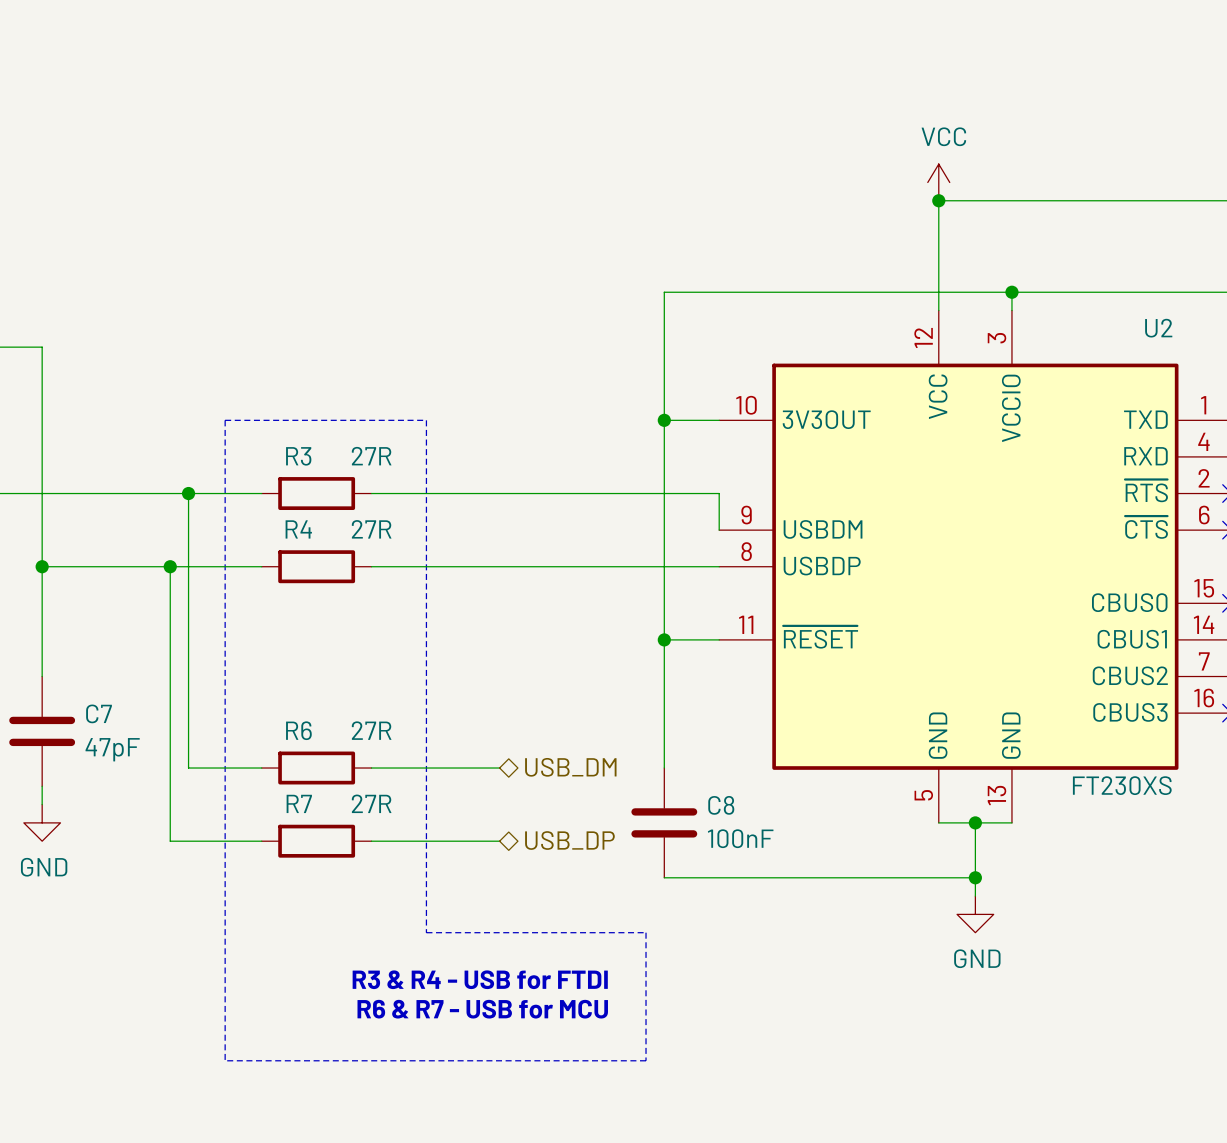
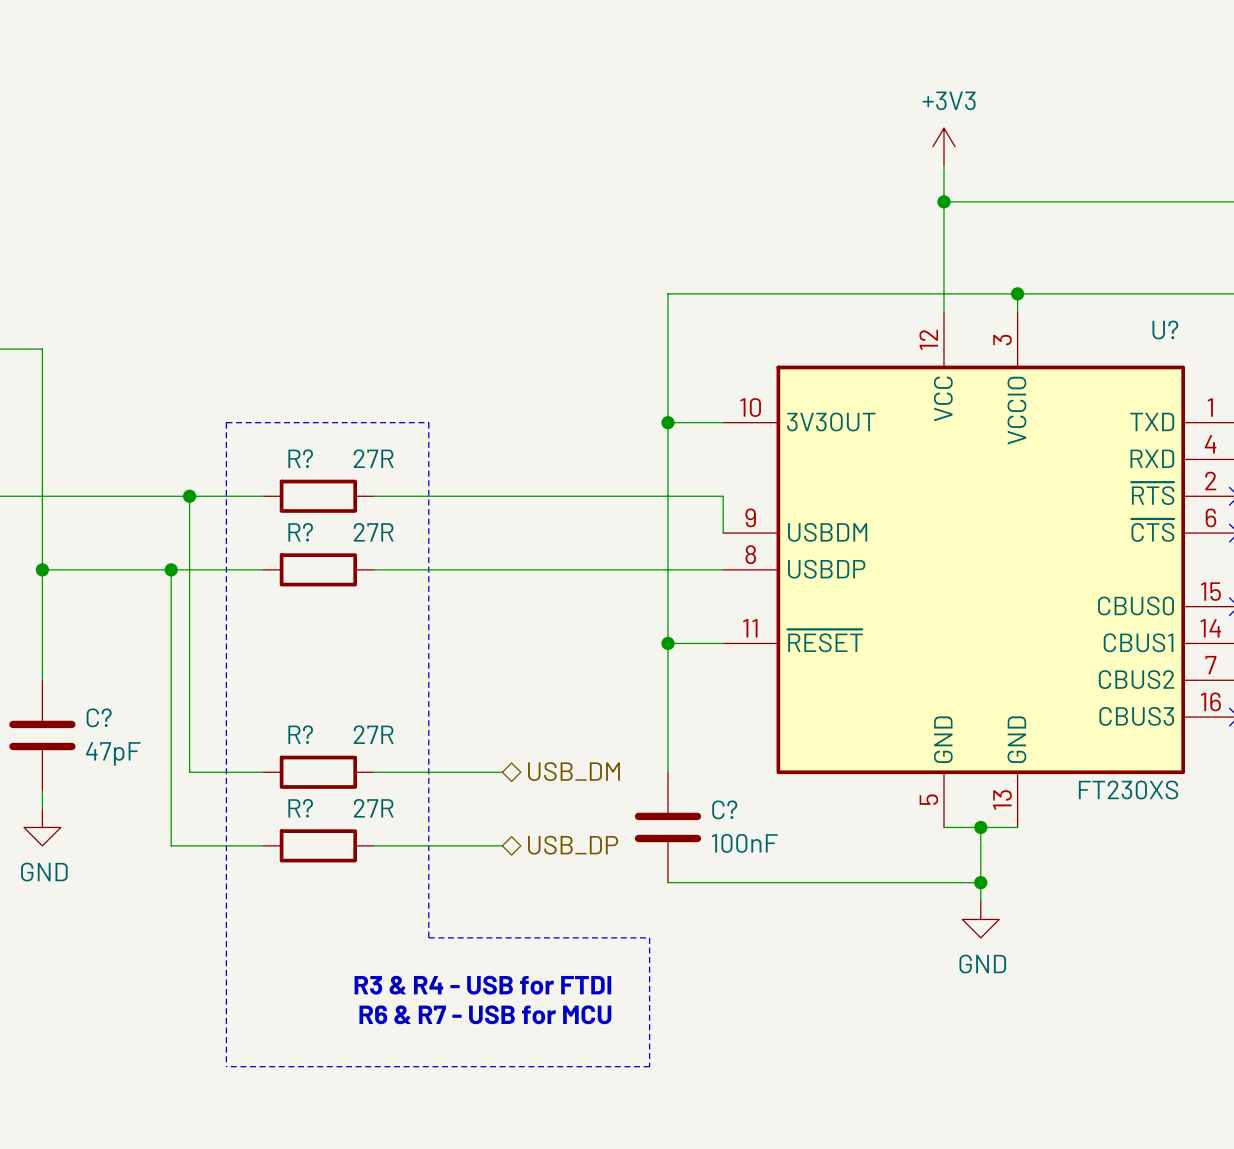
power symbol: none -> +3V3 (943, 146)
power symbol: VCC (938, 182) -> none
U2 name: U2 (1158, 328) -> U? (1165, 329)
R3 name: R3 (298, 456) -> R? (300, 458)
R4 name: R4 (298, 529) -> R? (300, 532)
C7 name: C7 (99, 713) -> C? (99, 717)
R6 name: R6 (298, 730) -> R? (300, 734)
R7 name: R7 (299, 803) -> R? (300, 808)
C8 name: C8 (721, 805) -> C? (724, 809)

